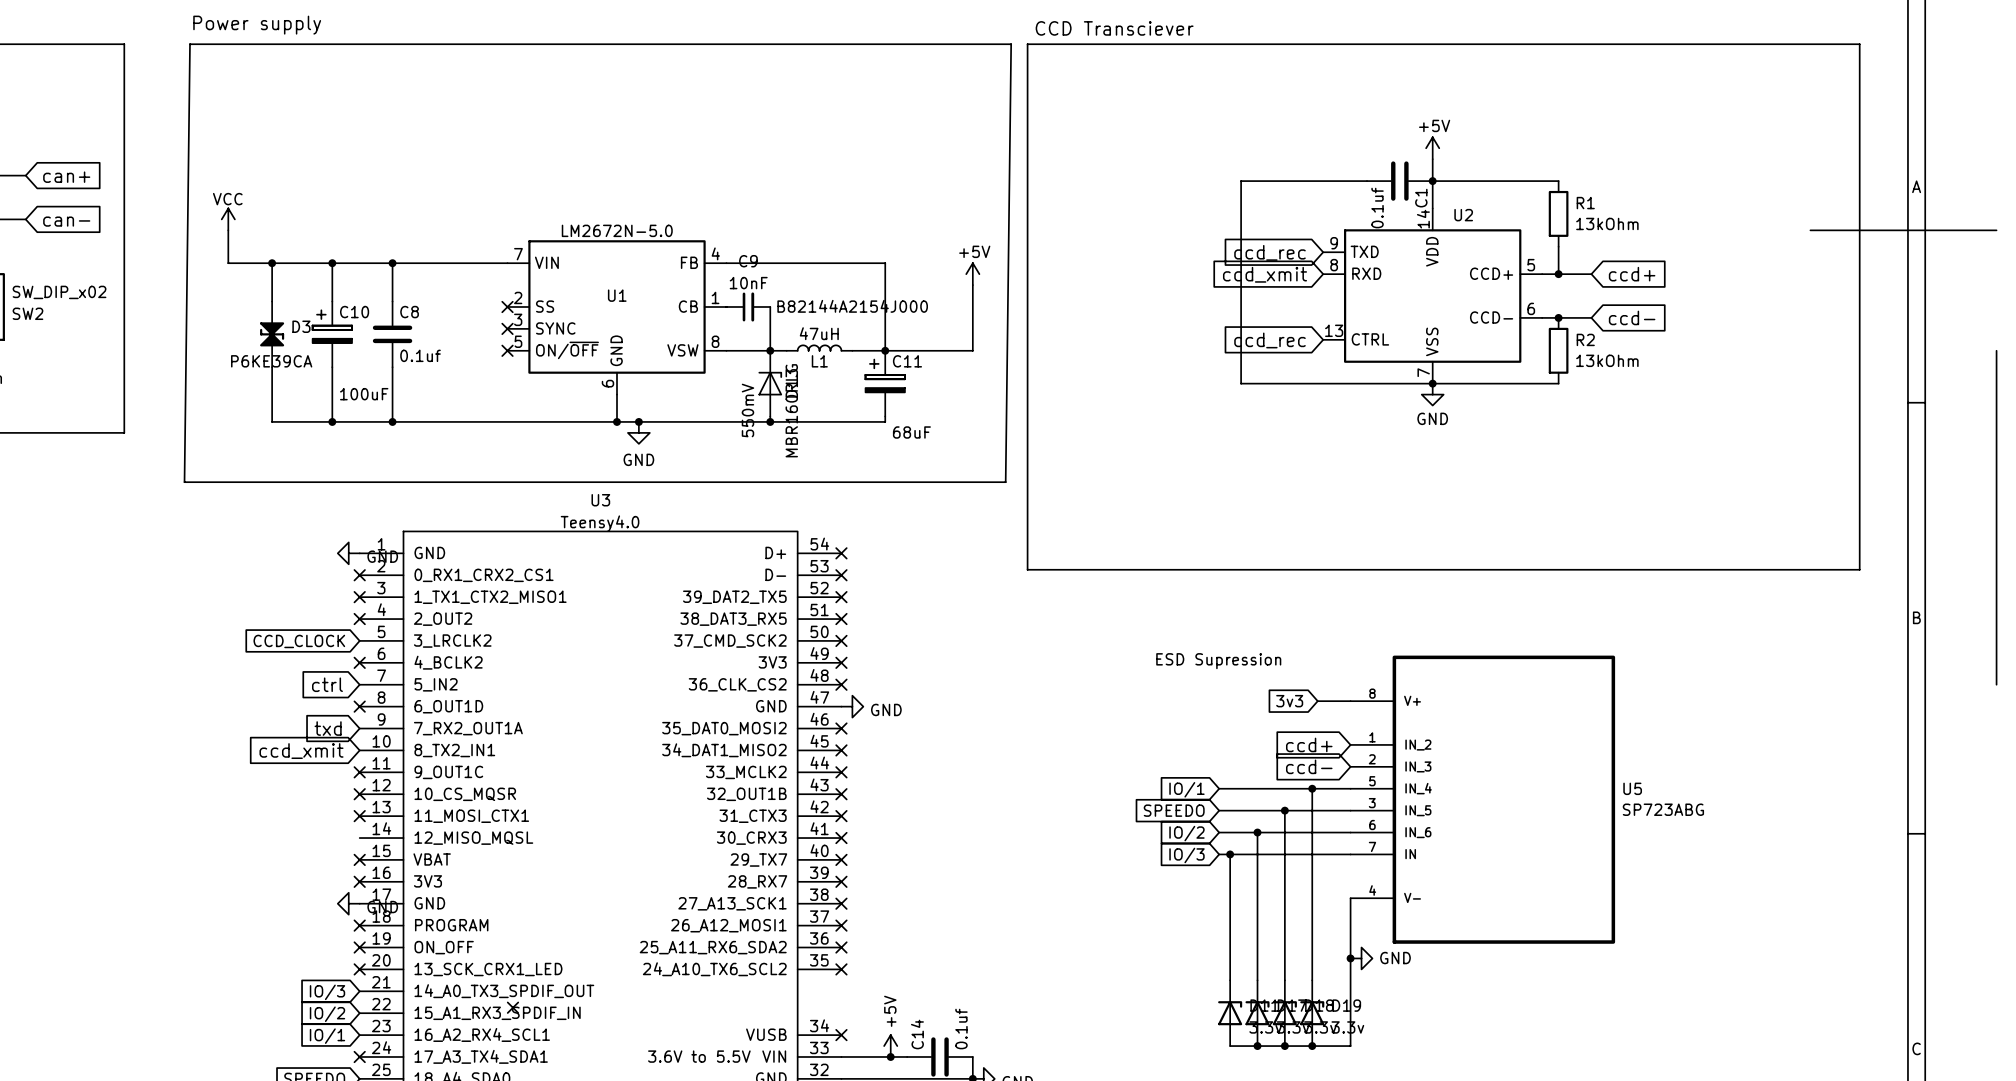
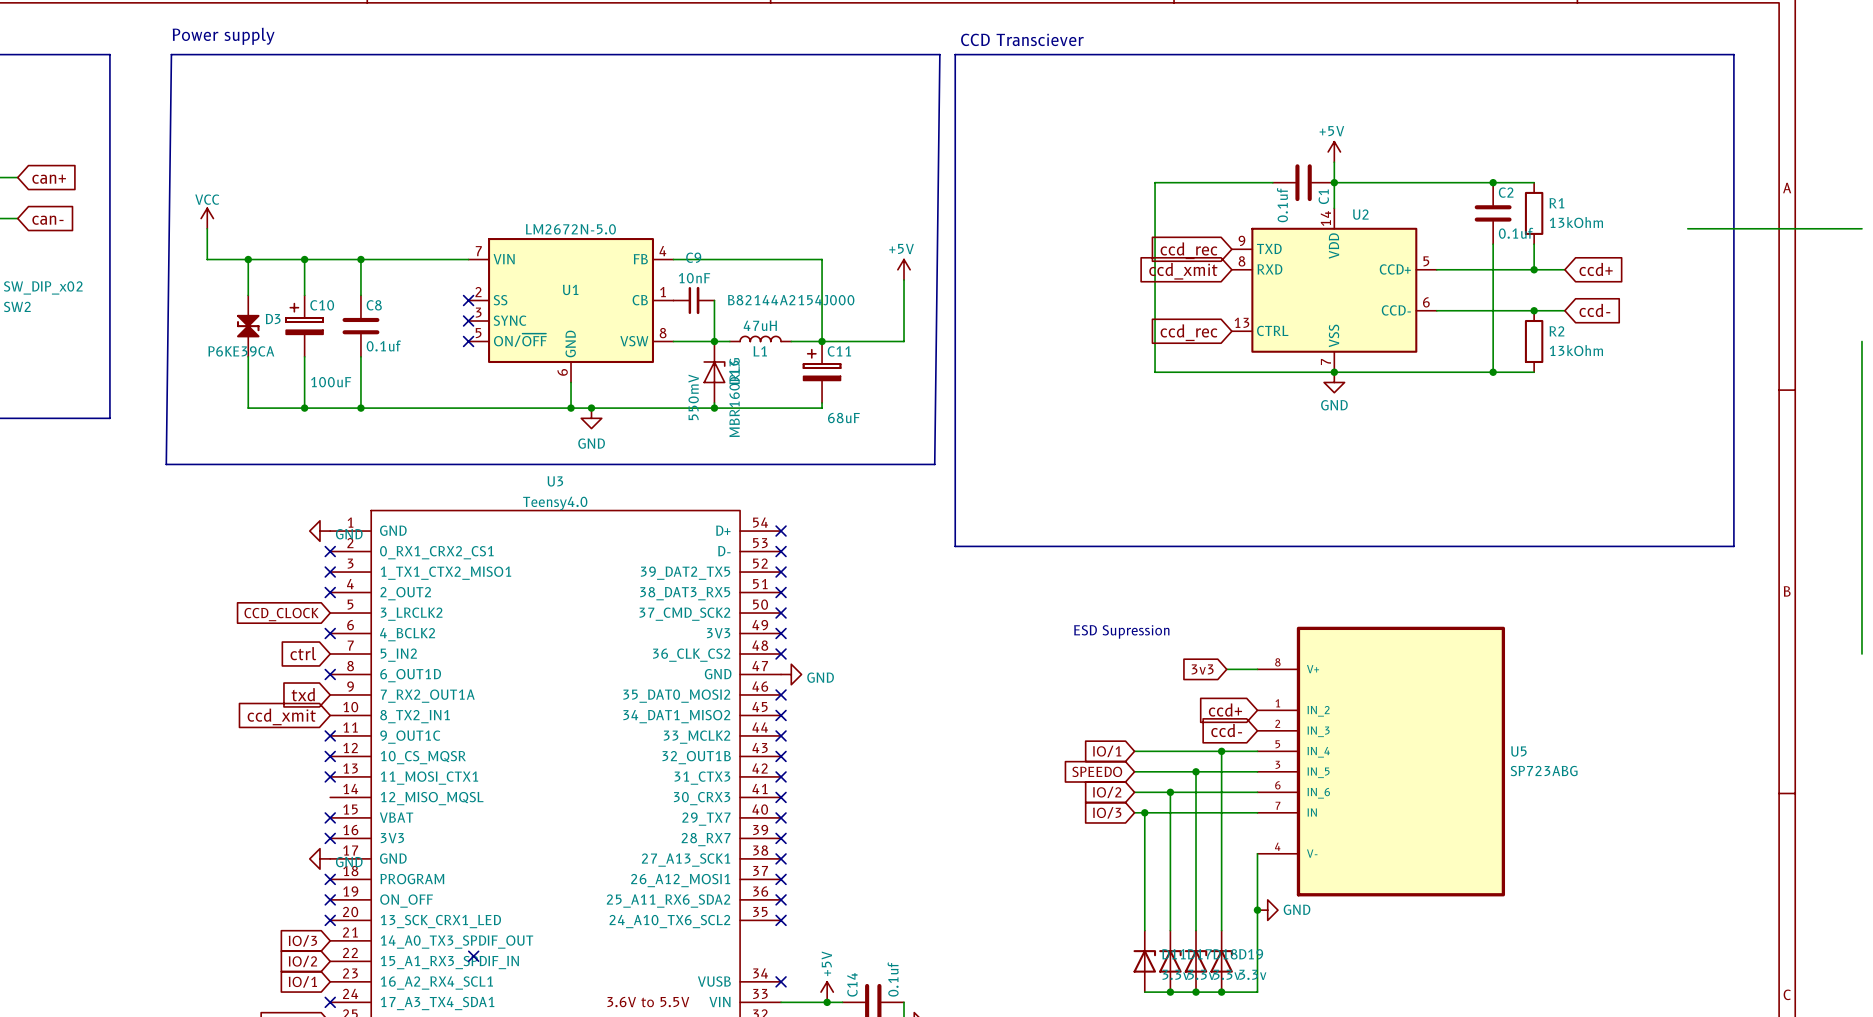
wire: none -> (1452, 182) (1534, 182)
junction: none -> (1493, 182)
R1 position: (1558, 213) -> (1534, 213)
C2: none -> 0.1uf (1493, 213)
wire: (1558, 246) (1558, 274) -> (1534, 244) (1534, 269)
wire: none -> (1493, 244) (1493, 372)
junction: (1558, 274) -> none
wire: none -> (1482, 269) (1564, 269)
global label position: ccd+ (1632, 274) -> ccd+ (1596, 269)
junction: none -> (1534, 269)
junction: (1558, 317) -> none
wire: none -> (1482, 310) (1564, 310)
global label position: ccd- (1632, 317) -> ccd- (1594, 310)
junction: none -> (1534, 310)
R2 position: (1558, 350) -> (1534, 341)
wire: none -> (1452, 372) (1534, 372)
junction: none -> (1493, 372)

